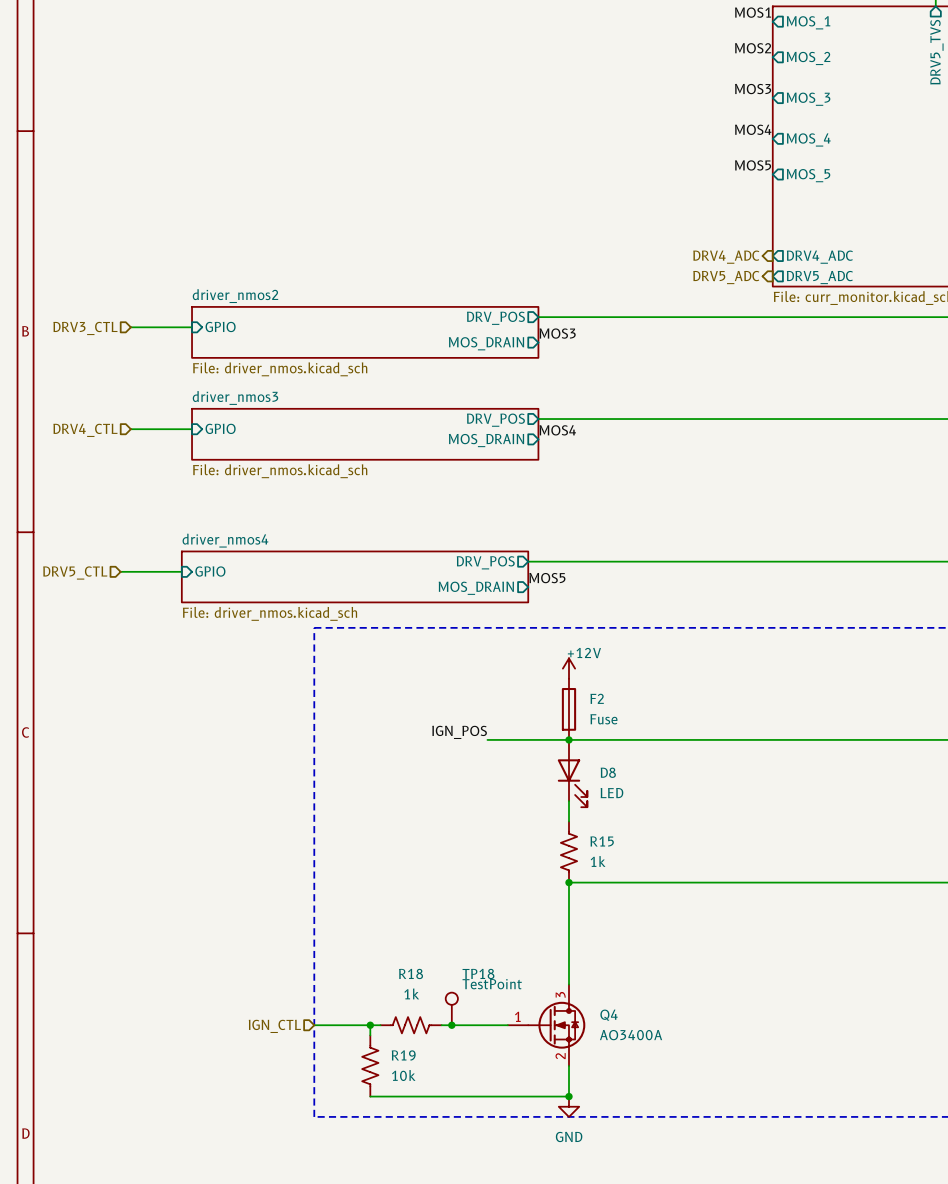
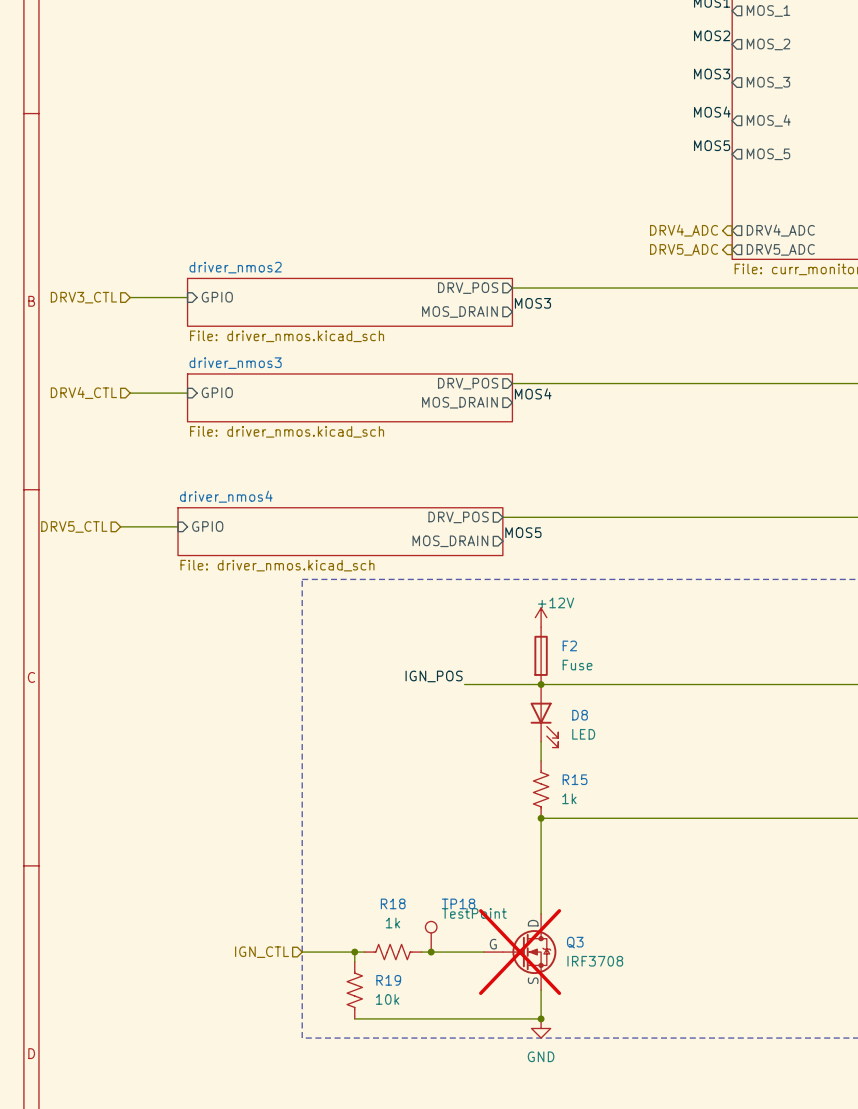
Q4: AO3400A (546, 1025) -> none
Q3: none -> IRF3708 (520, 952)

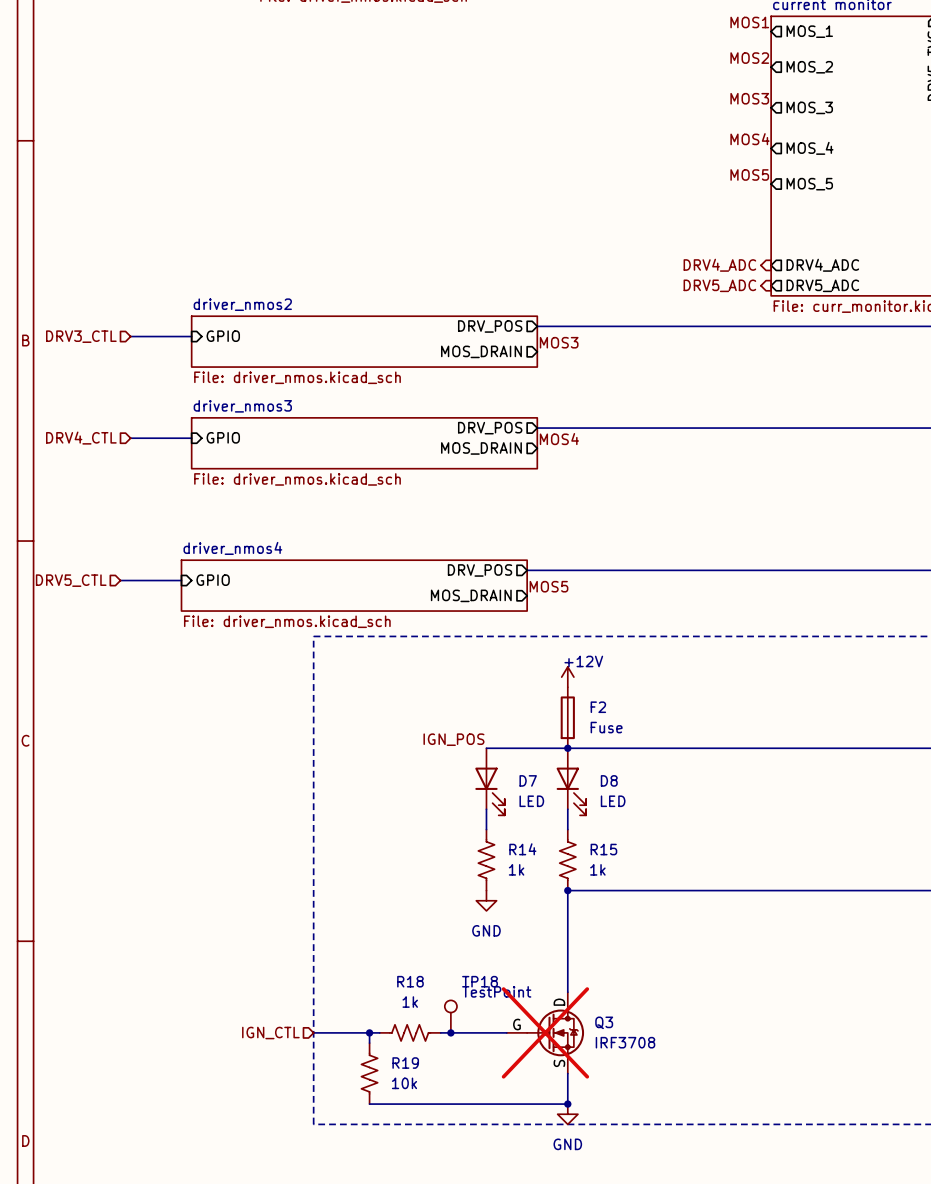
D7: none -> LED (490, 781)
wire: none -> (486, 809) (486, 829)
R14: none -> 1k (486, 860)
power symbol: none -> GND (486, 900)

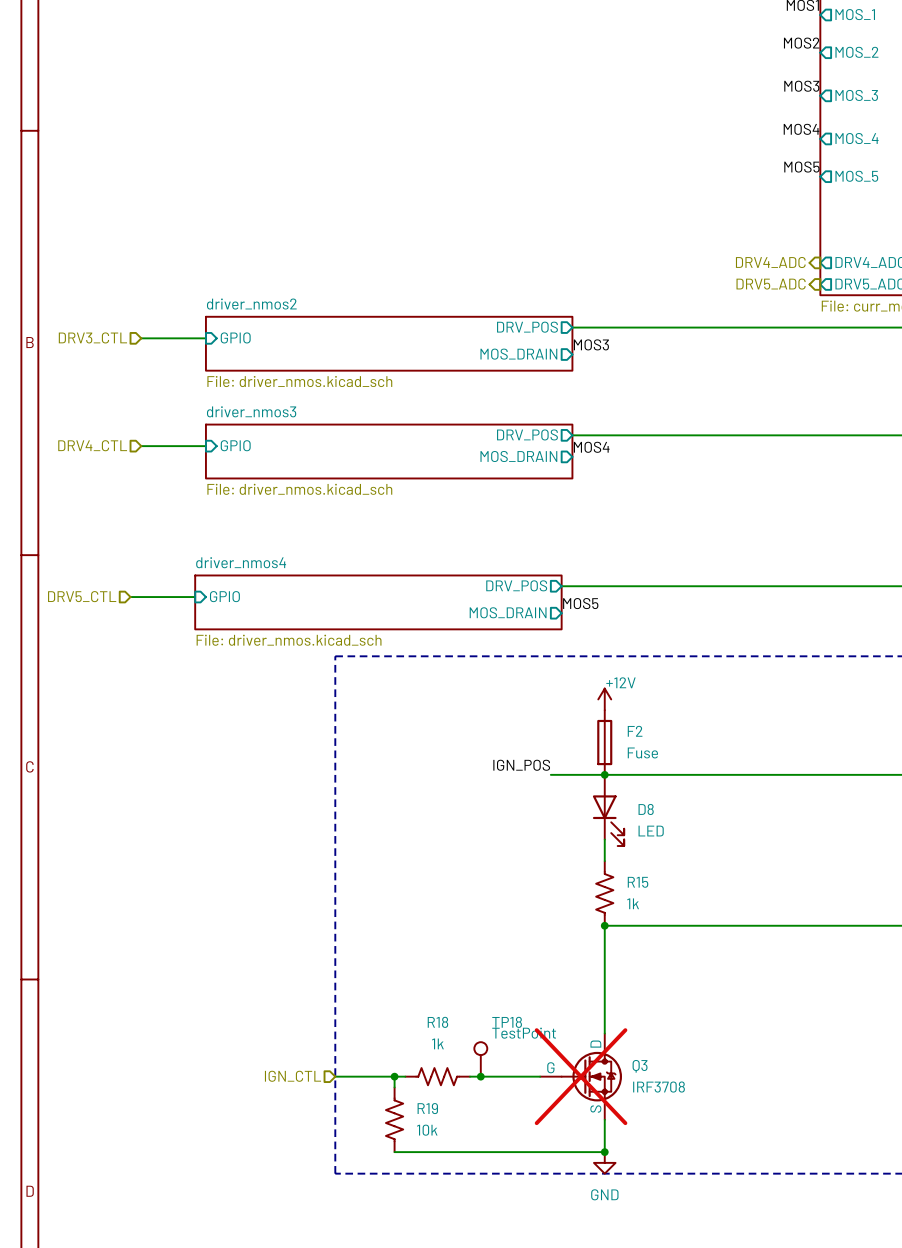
label position: IGN_POS (453, 739) -> IGN_POS (521, 765)
wire: (486, 748) (516, 748) -> none
D7: LED (490, 781) -> none
wire: (486, 809) (486, 829) -> none
R14: 1k (486, 860) -> none
power symbol: GND (486, 900) -> none

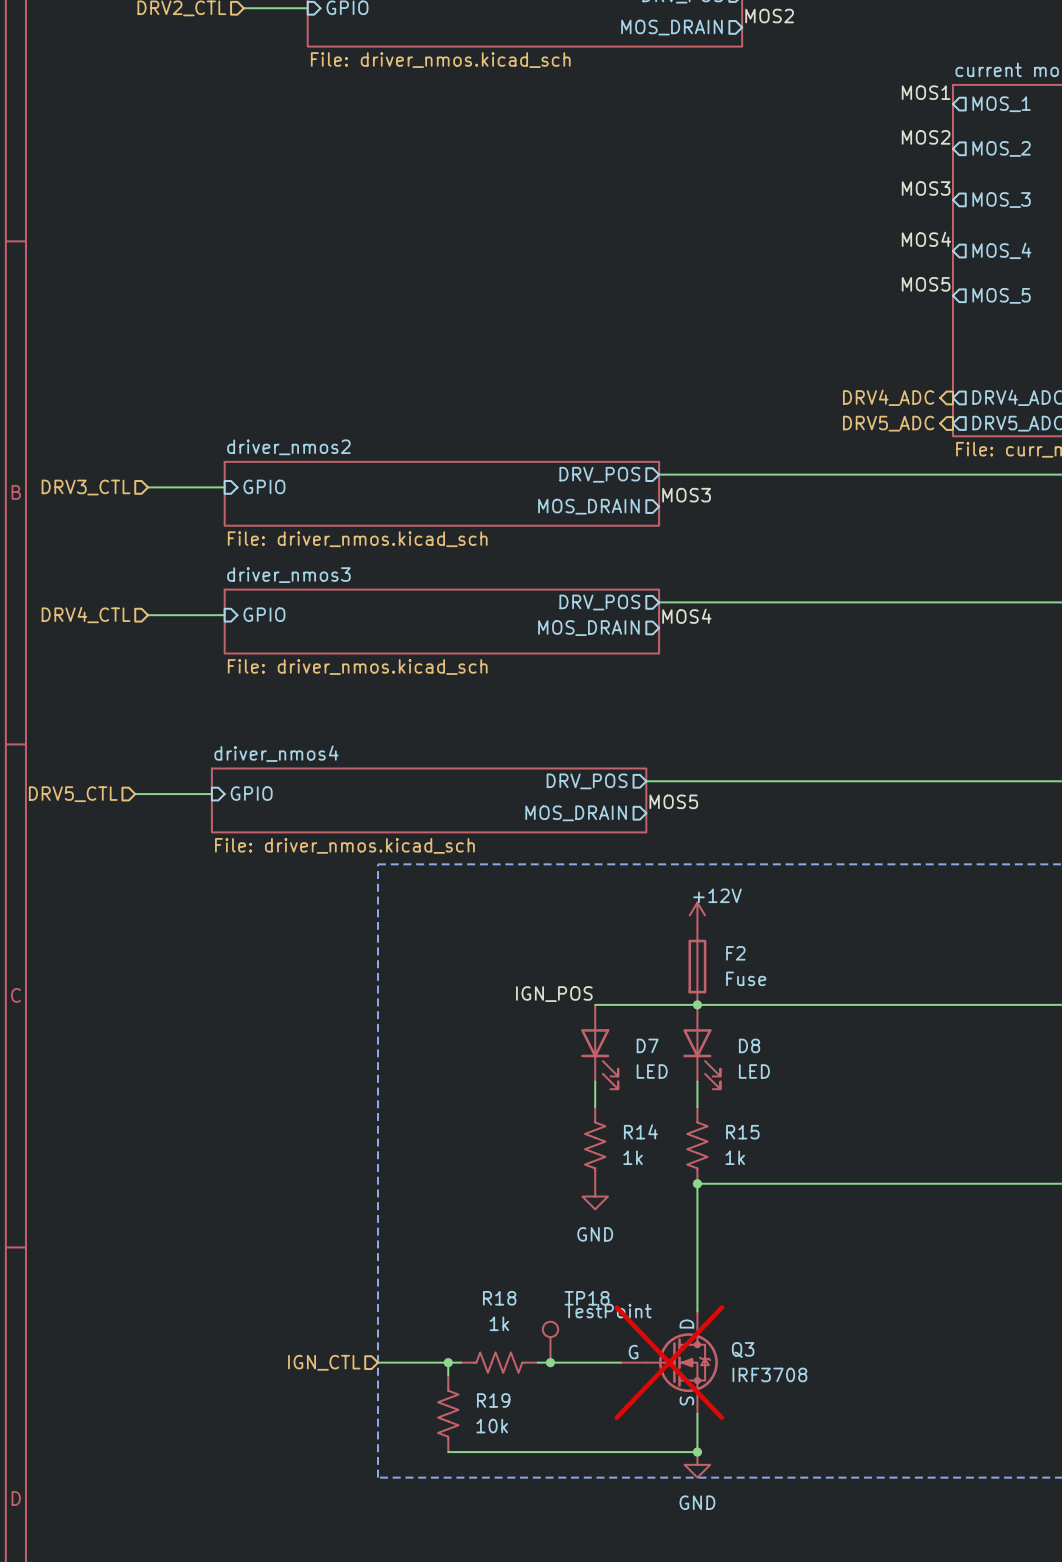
label position: IGN_POS (521, 765) -> IGN_POS (554, 994)
wire: none -> (595, 1004) (633, 1004)
D7: none -> LED (599, 1047)
wire: none -> (595, 1081) (595, 1107)
R14: none -> 1k (595, 1145)
power symbol: none -> GND (595, 1196)

